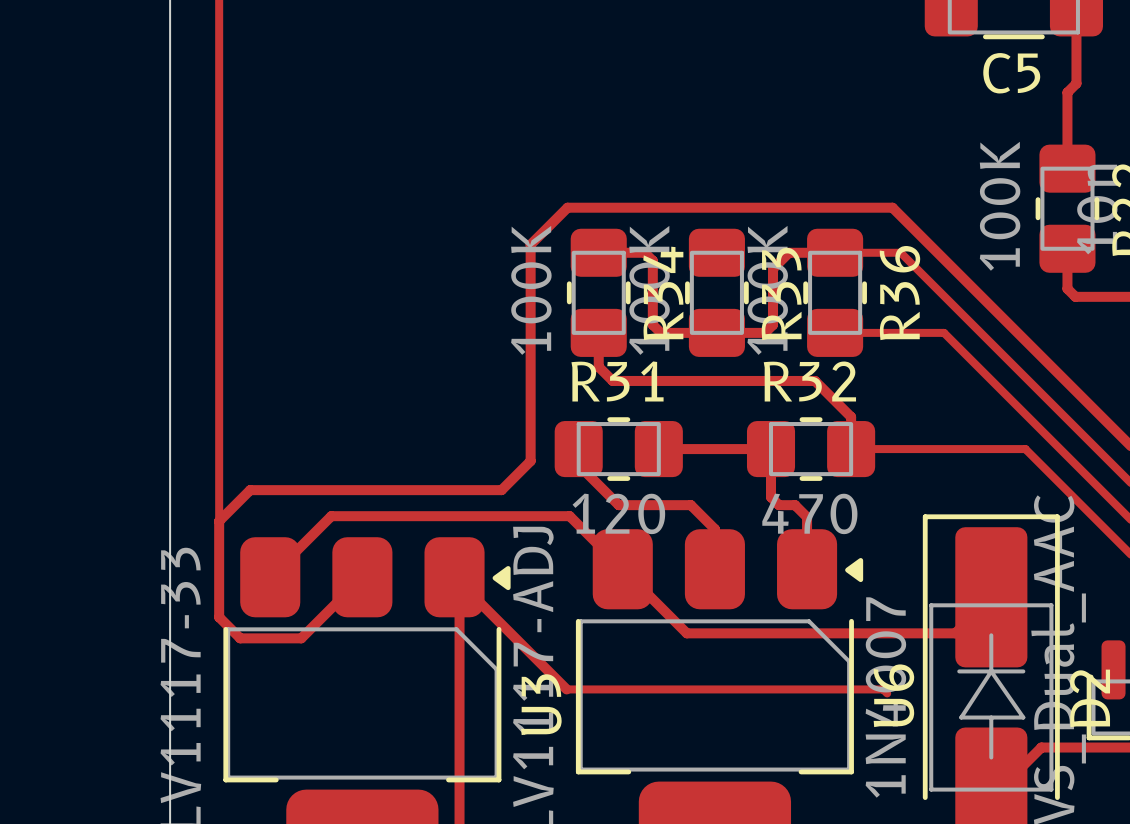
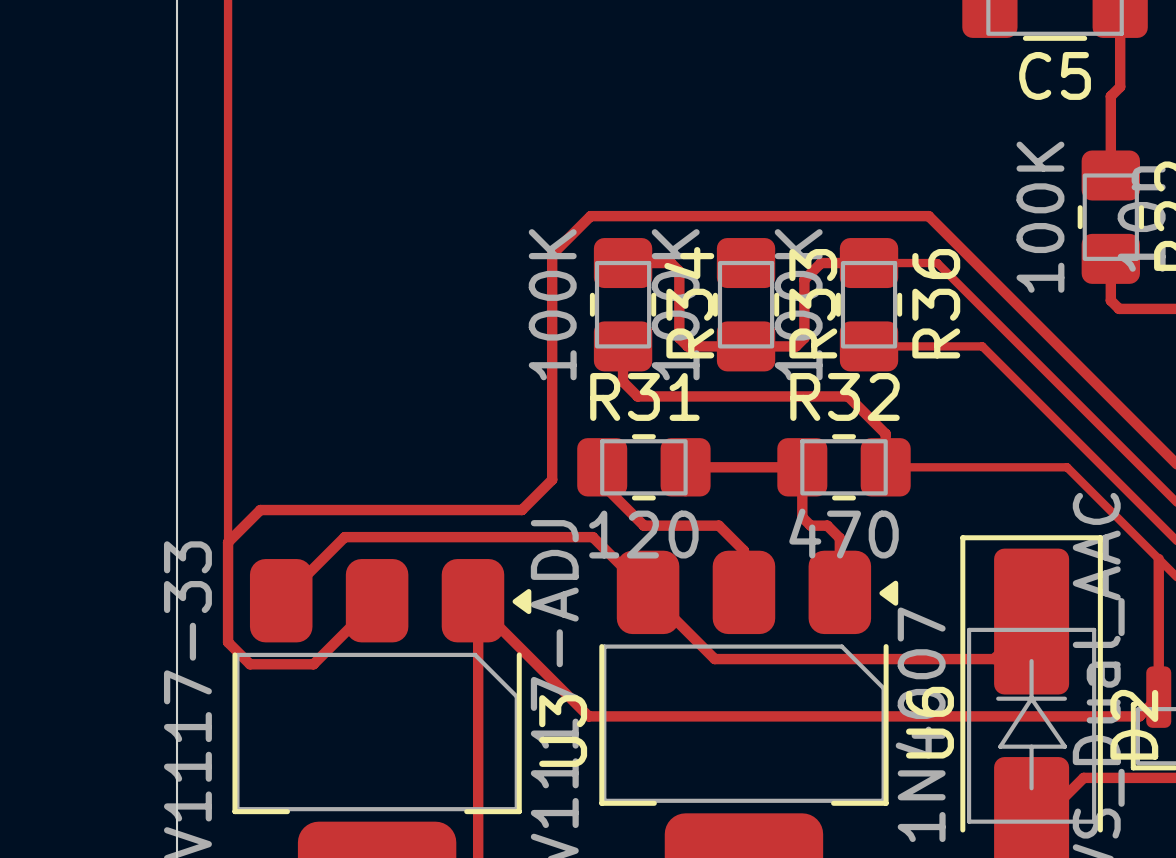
top track: (565, 688) (883, 689) (887, 693) -> (588, 716) (1139, 716) (1158, 697) (1158, 558)

